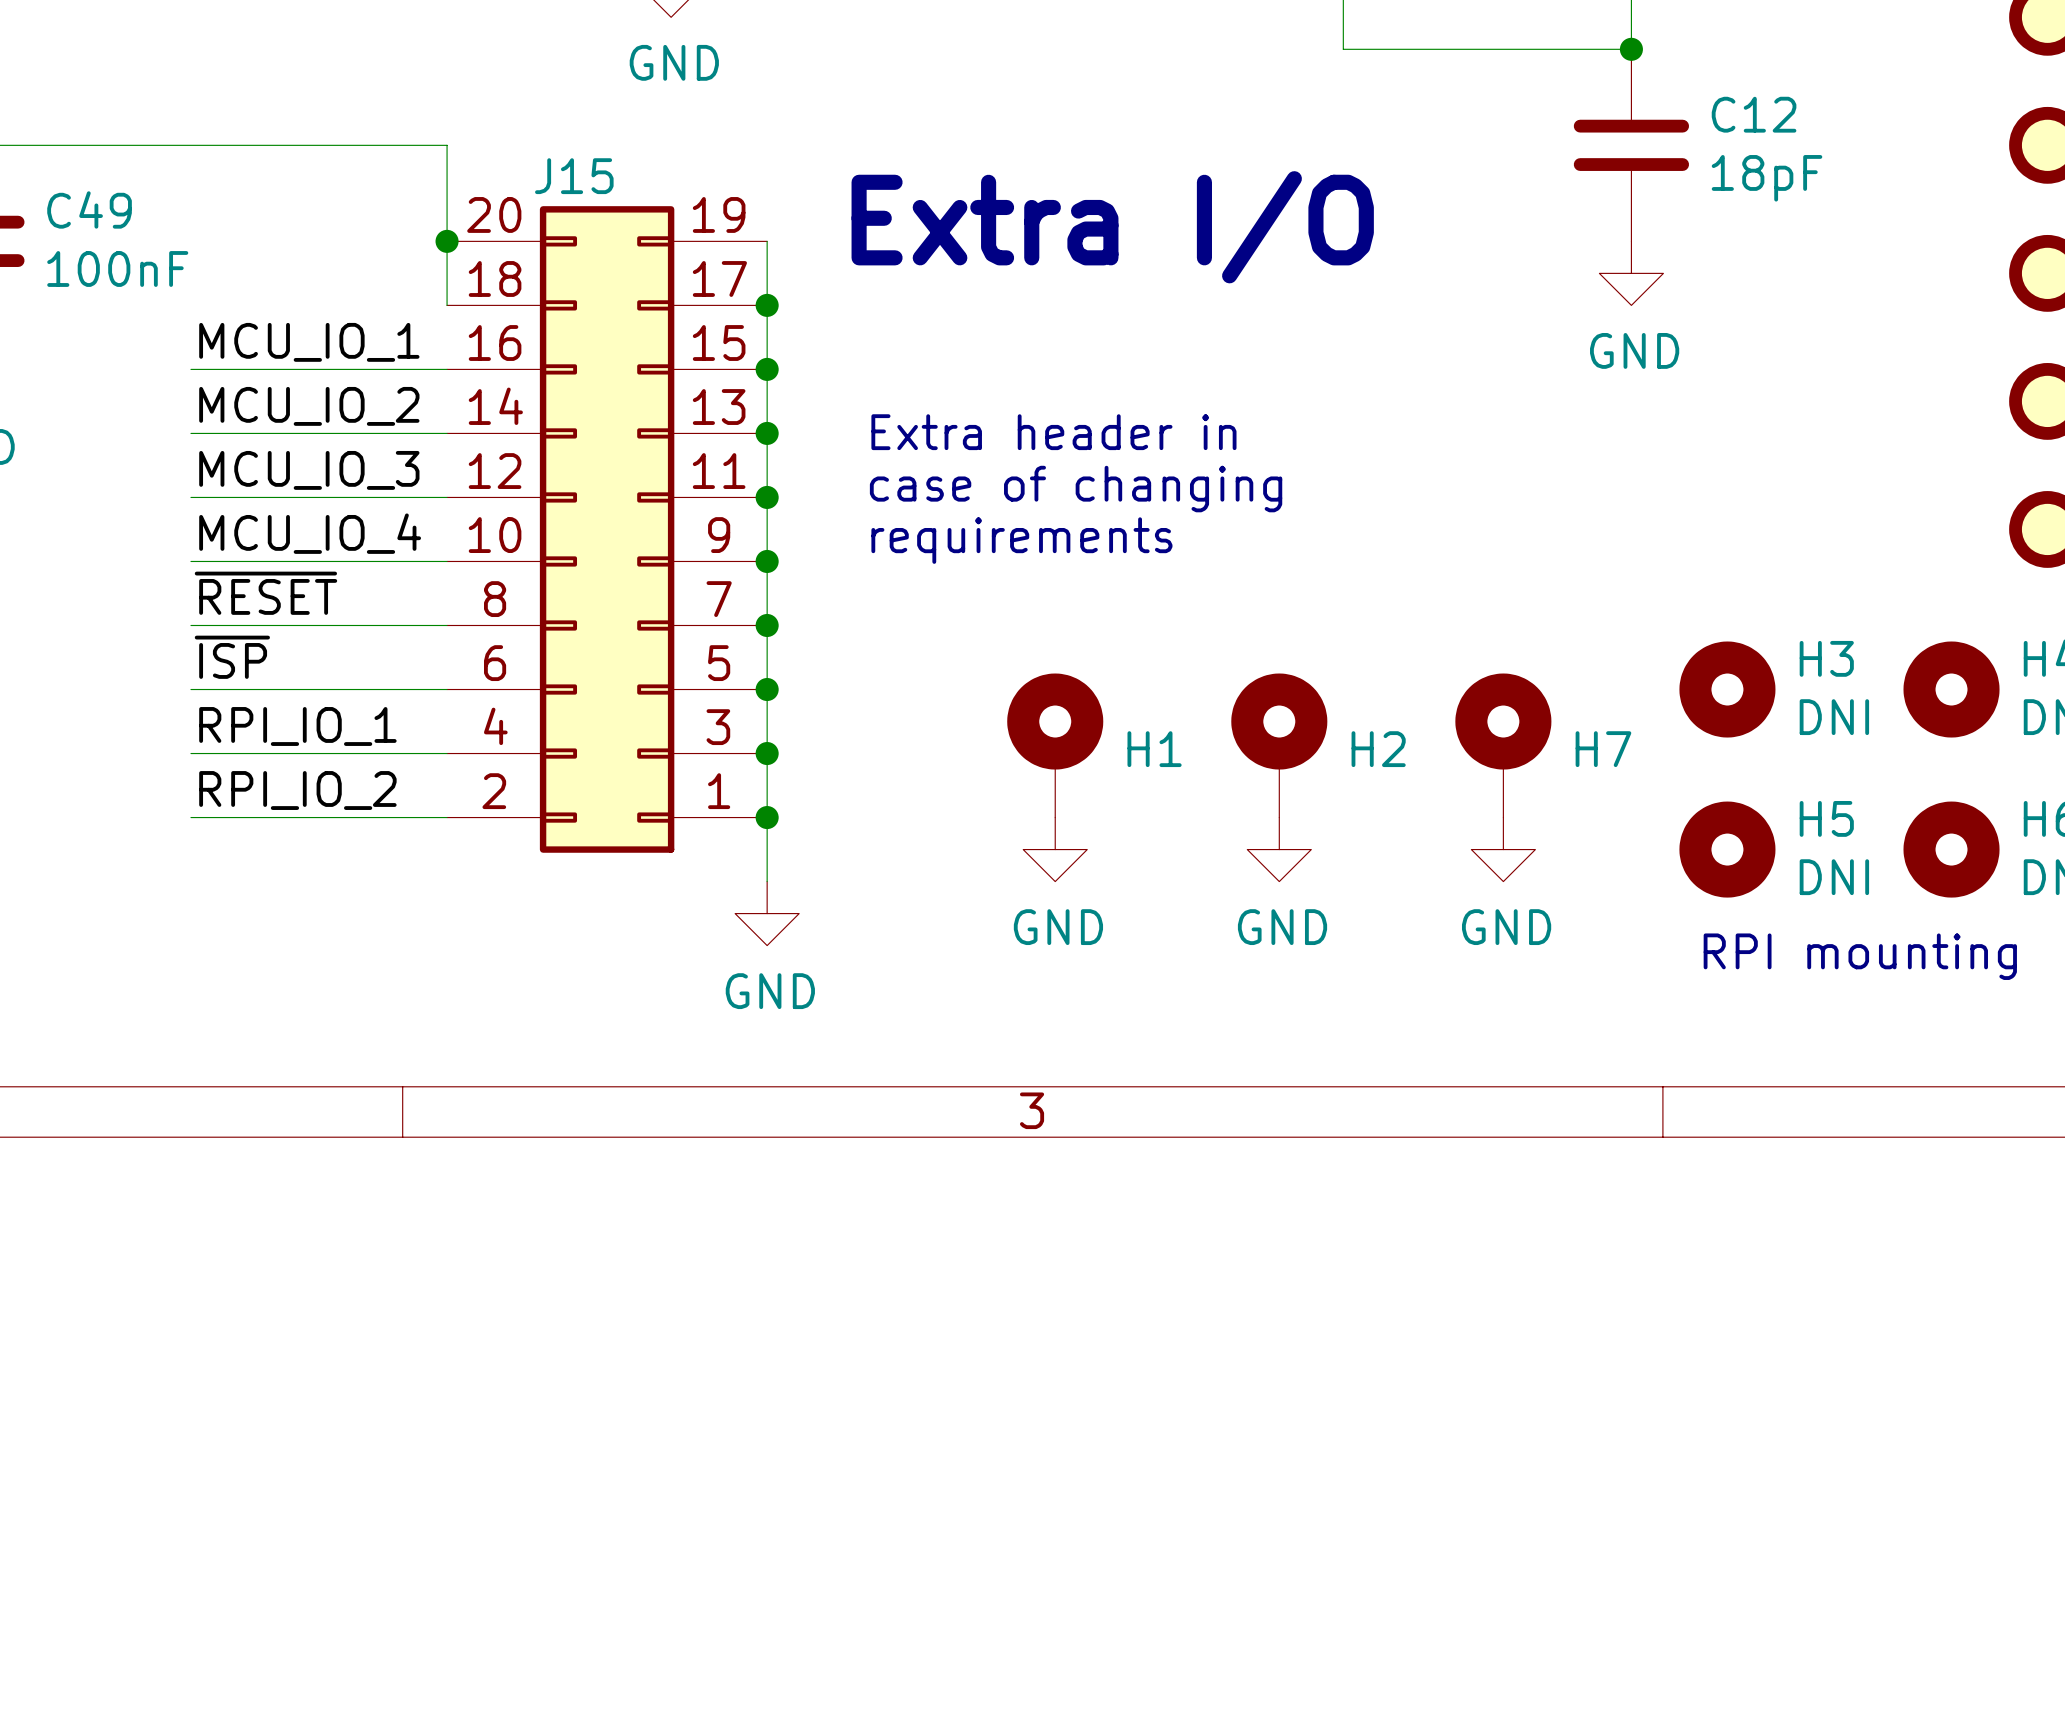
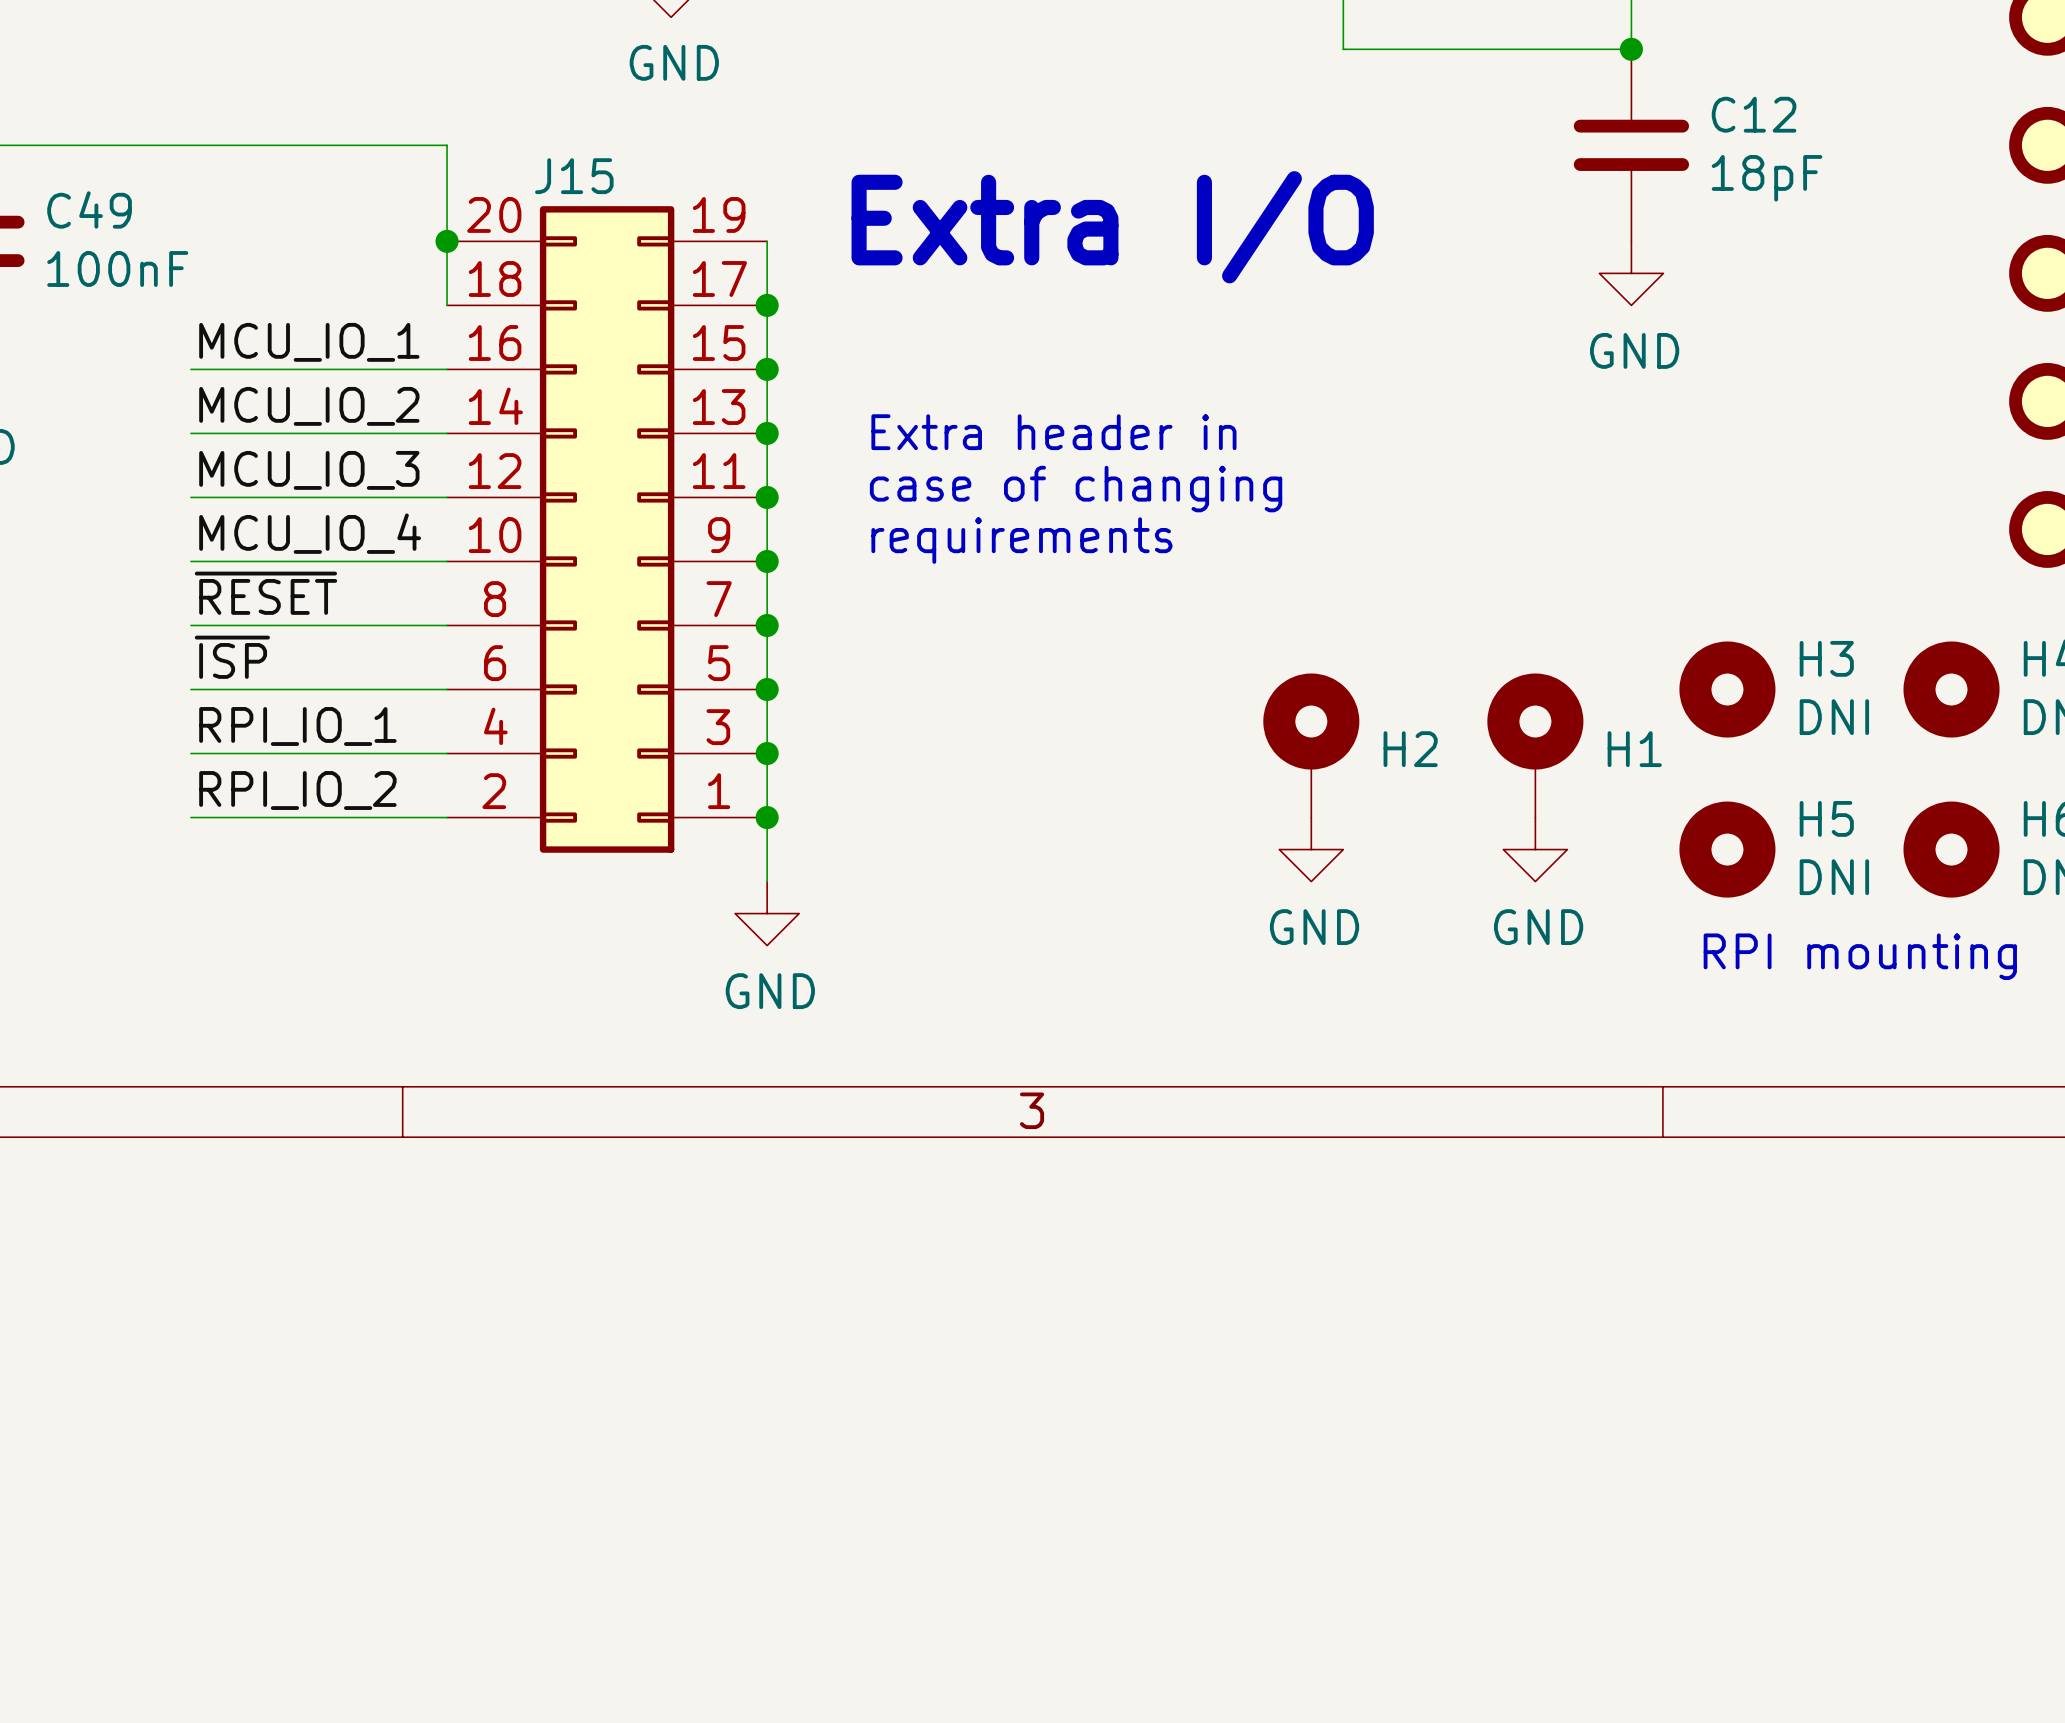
H1 position: (1055, 745) -> (1535, 745)
H2 position: (1279, 745) -> (1311, 745)
H7: (1503, 745) -> none
power symbol: GND (1055, 849) -> none
power symbol position: GND (1279, 849) -> GND (1311, 849)
power symbol position: GND (1503, 849) -> GND (1535, 849)

